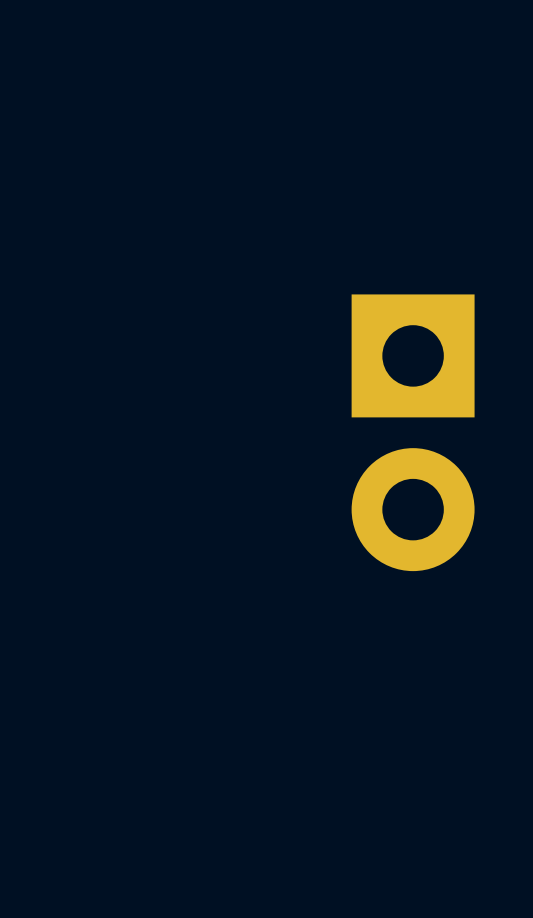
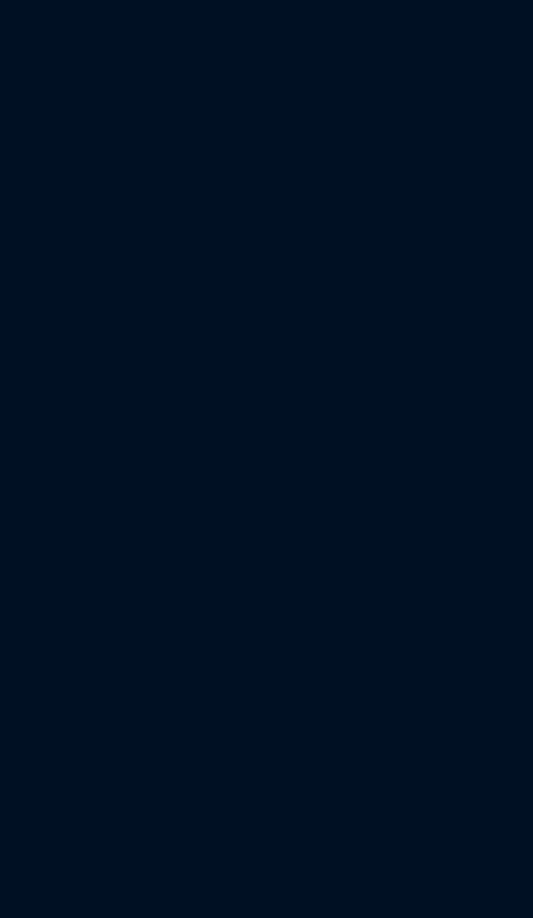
part: (413, 432) -> none

